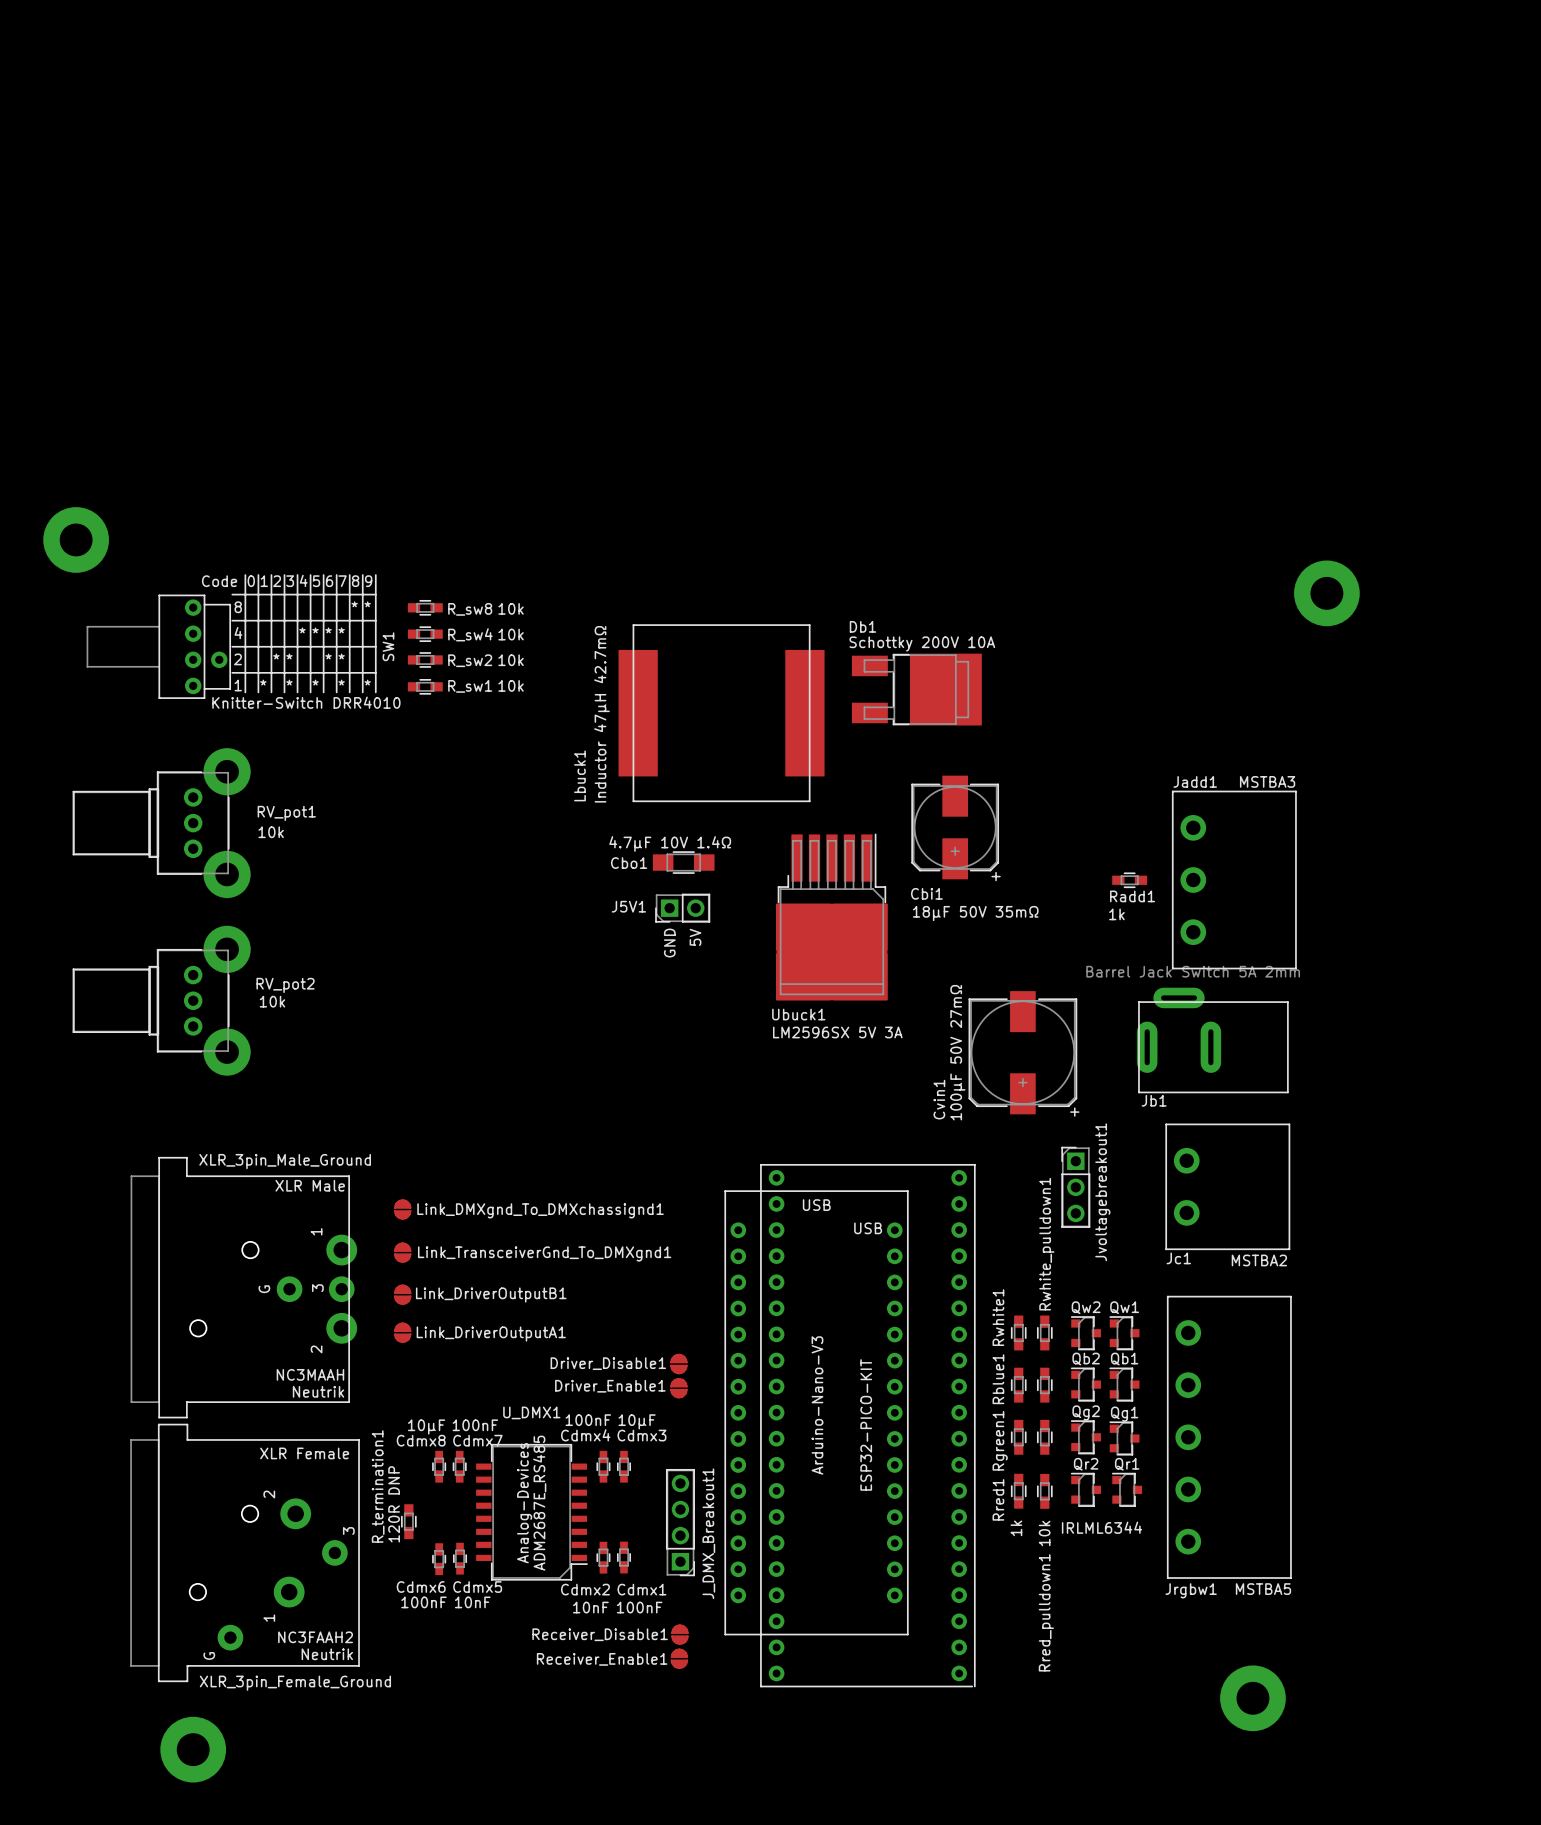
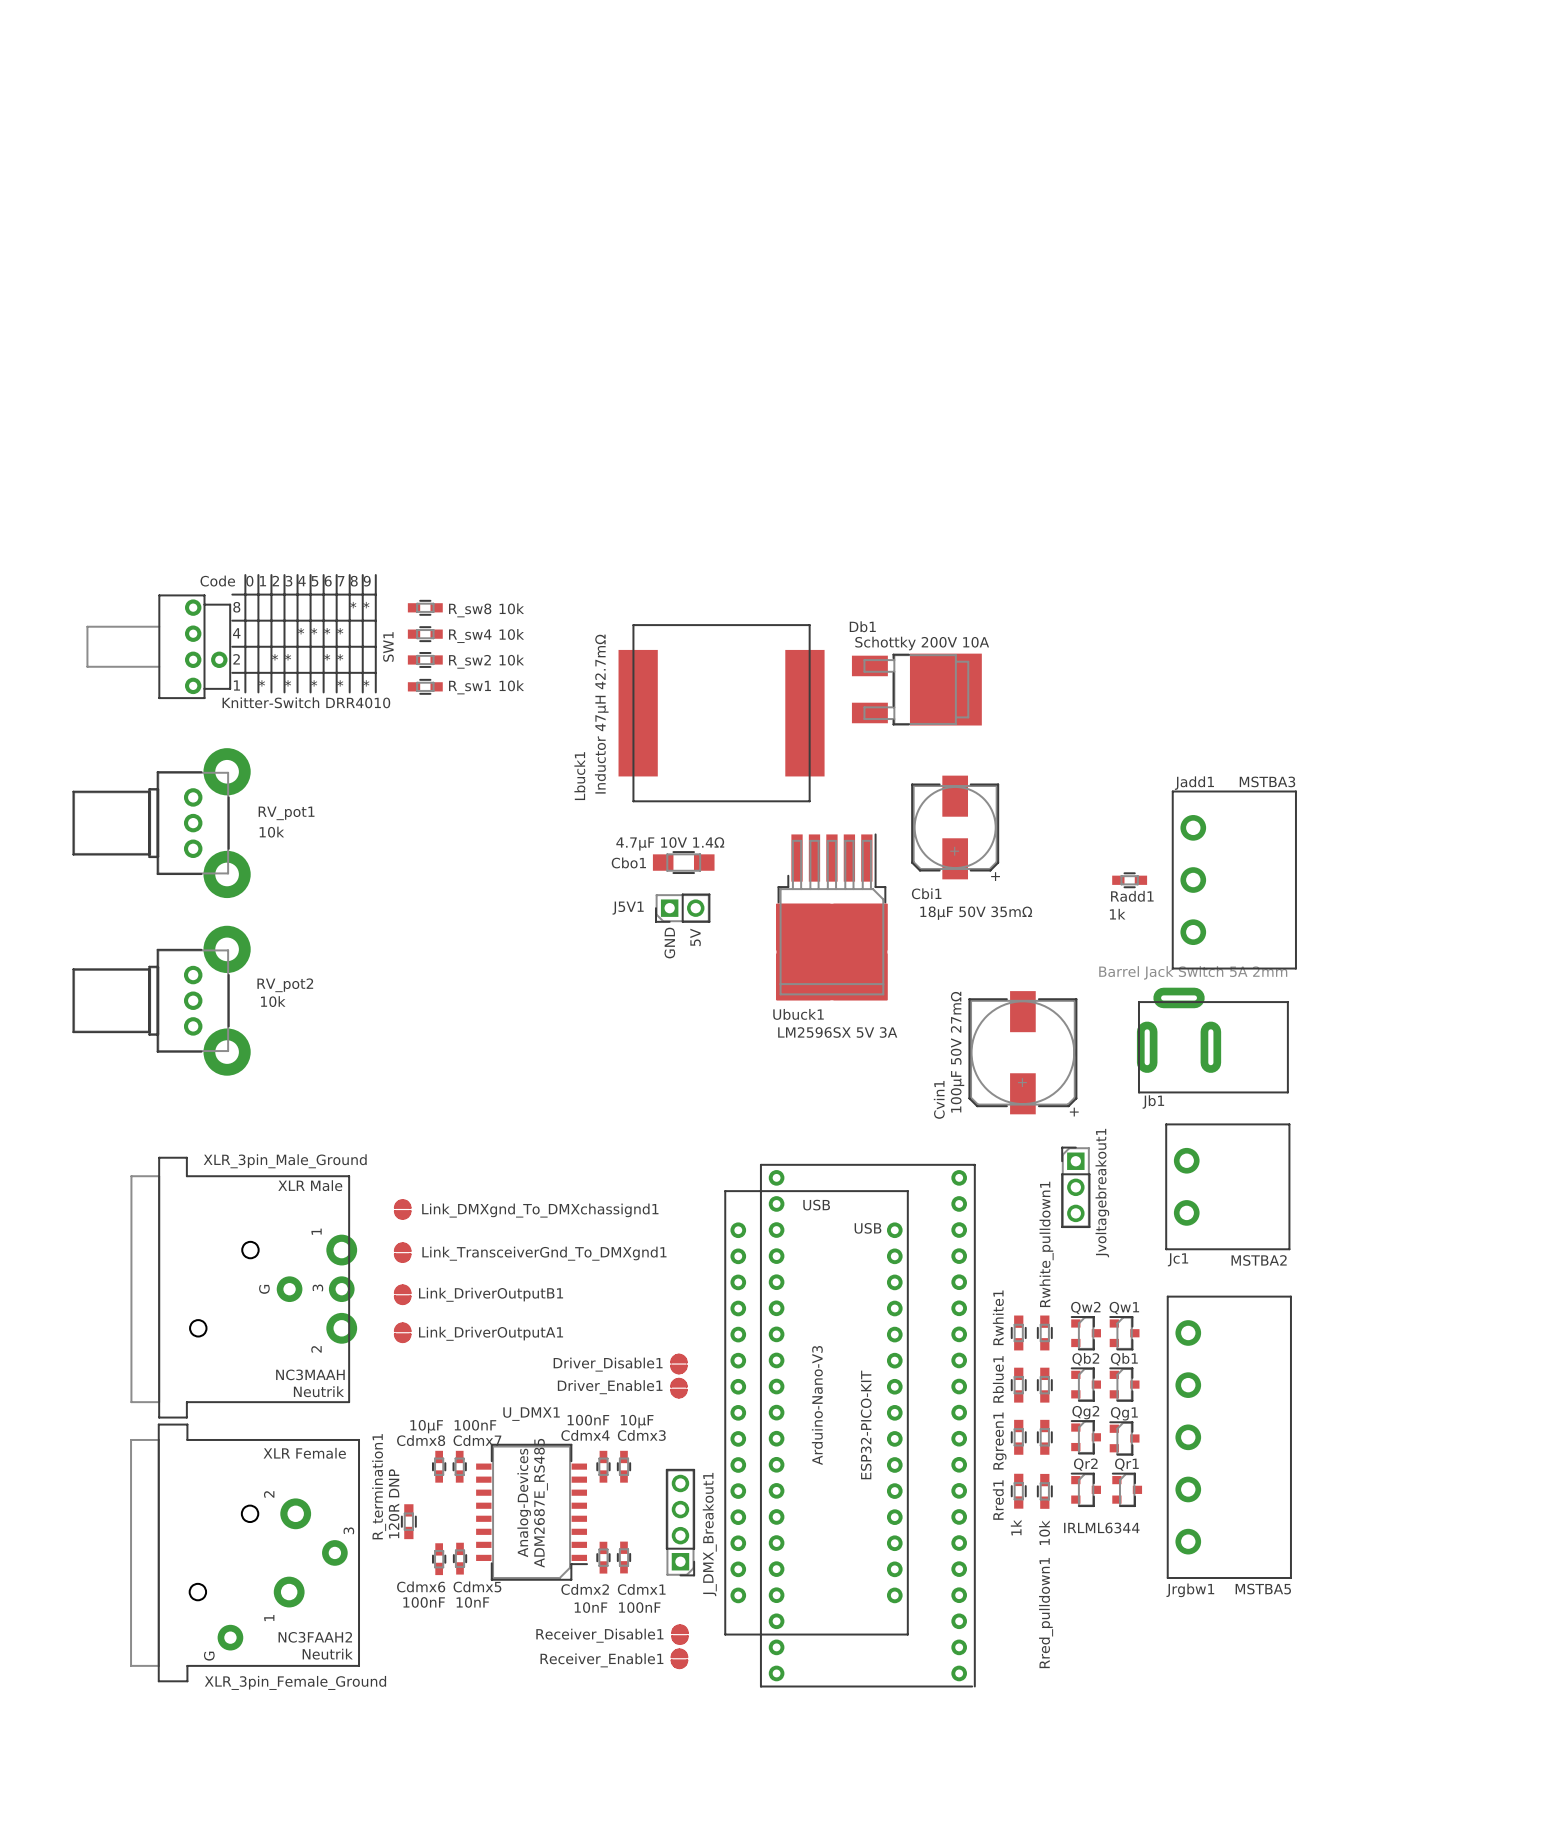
part: (76, 539) -> none
part: (1326, 593) -> none
part: (1252, 1698) -> none
part: (193, 1749) -> none

